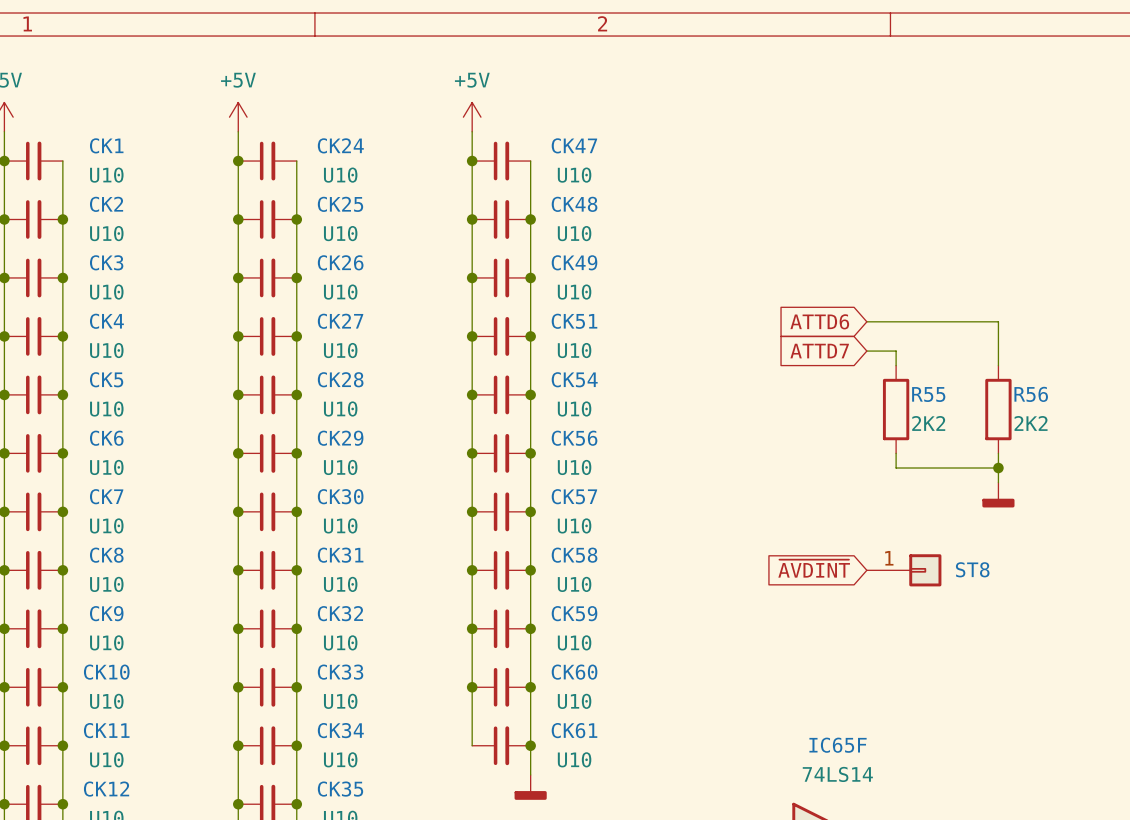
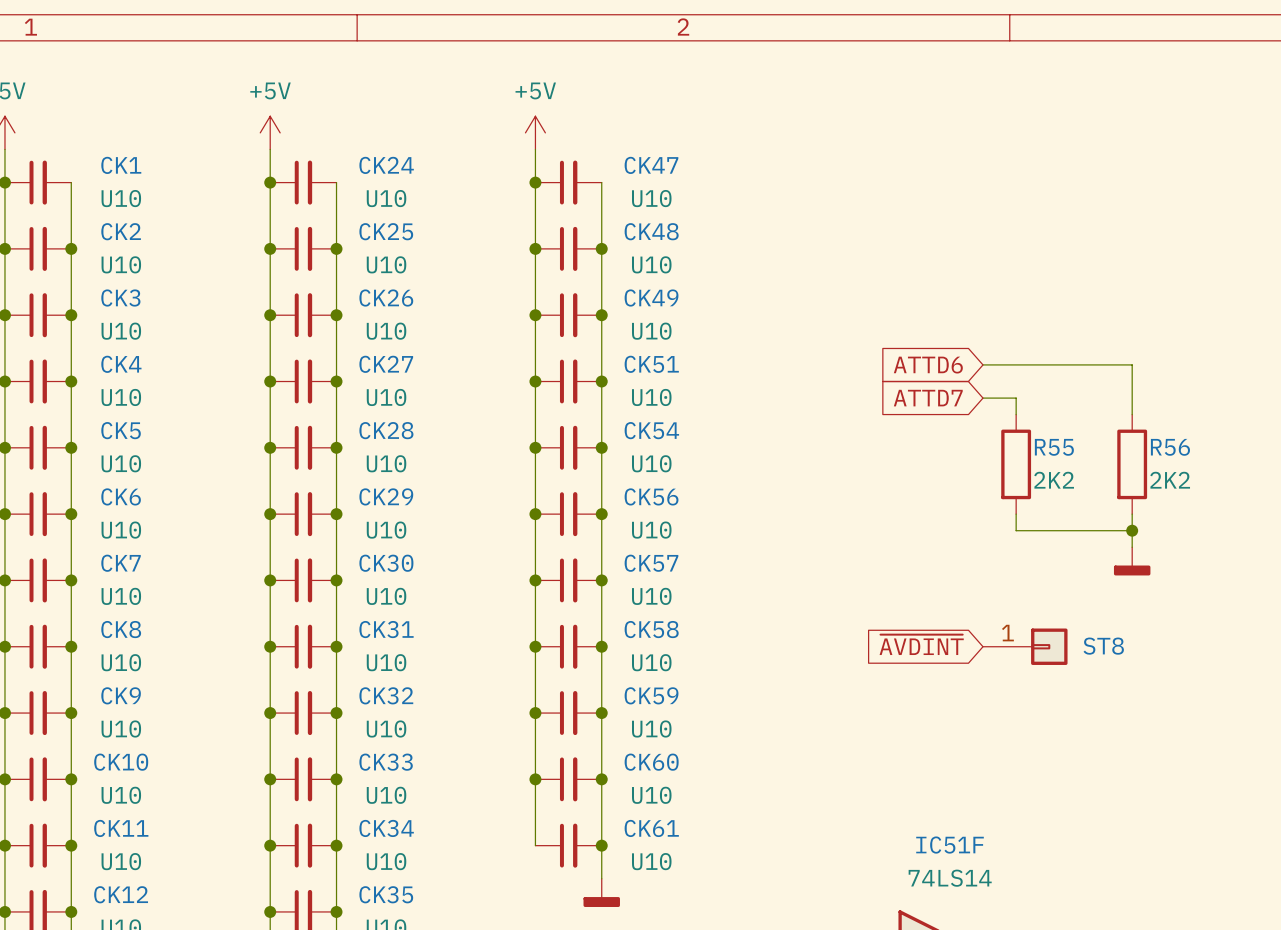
IC65F name: IC65F (838, 745) -> IC51F (950, 845)

